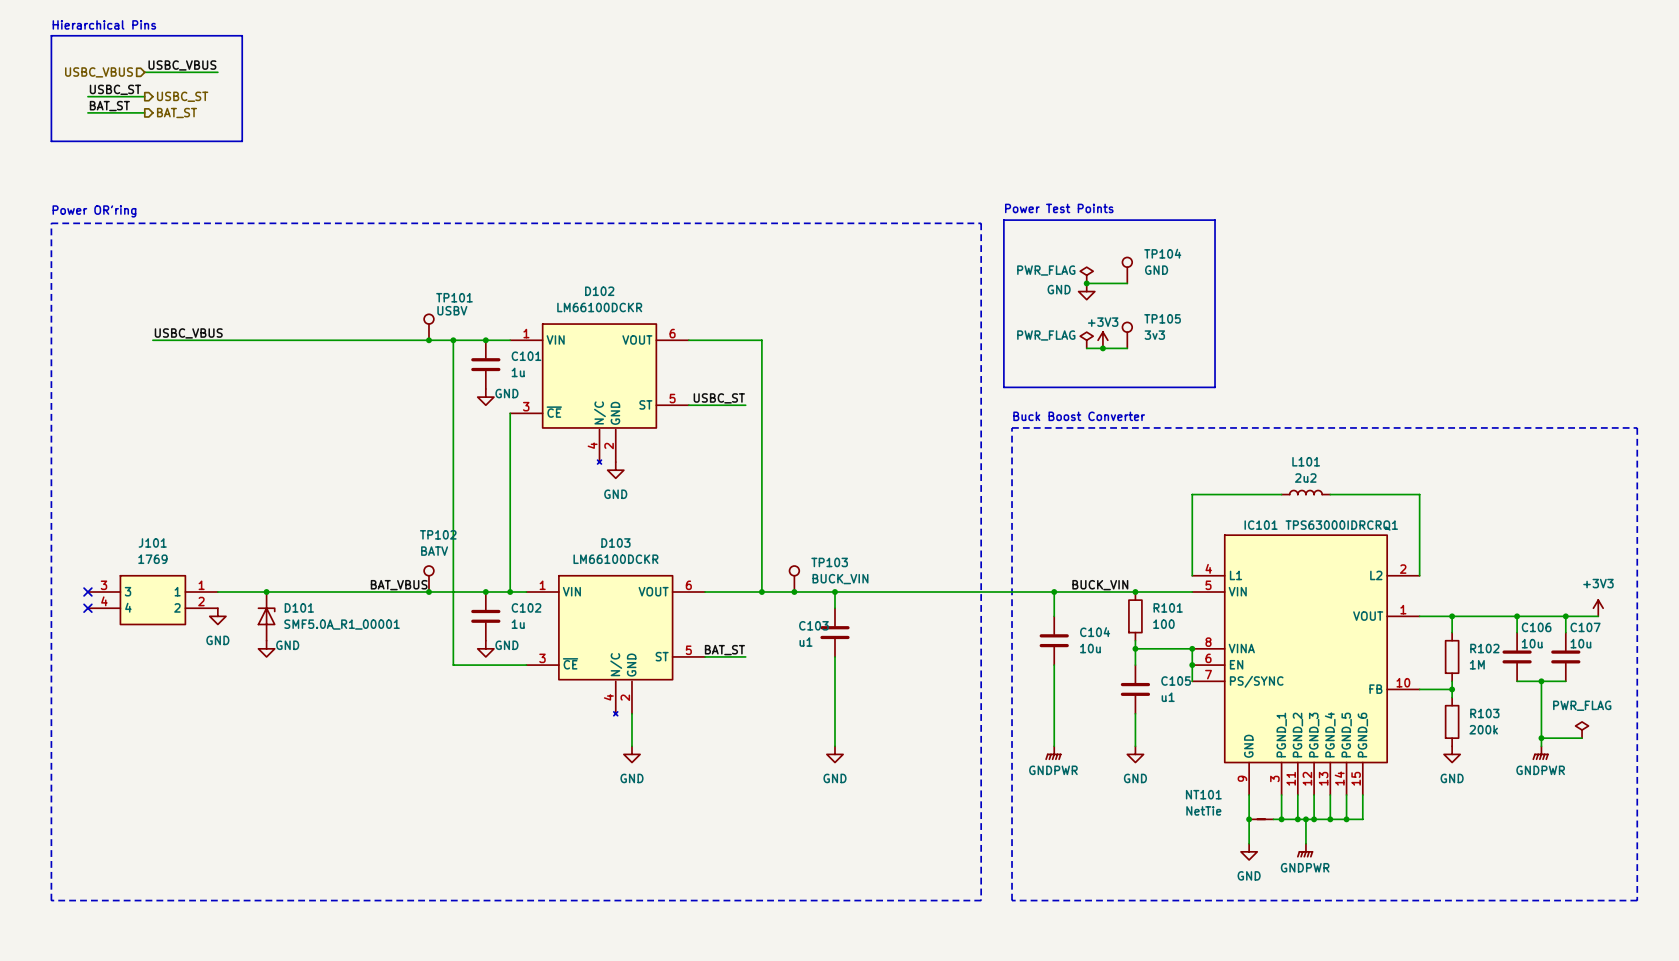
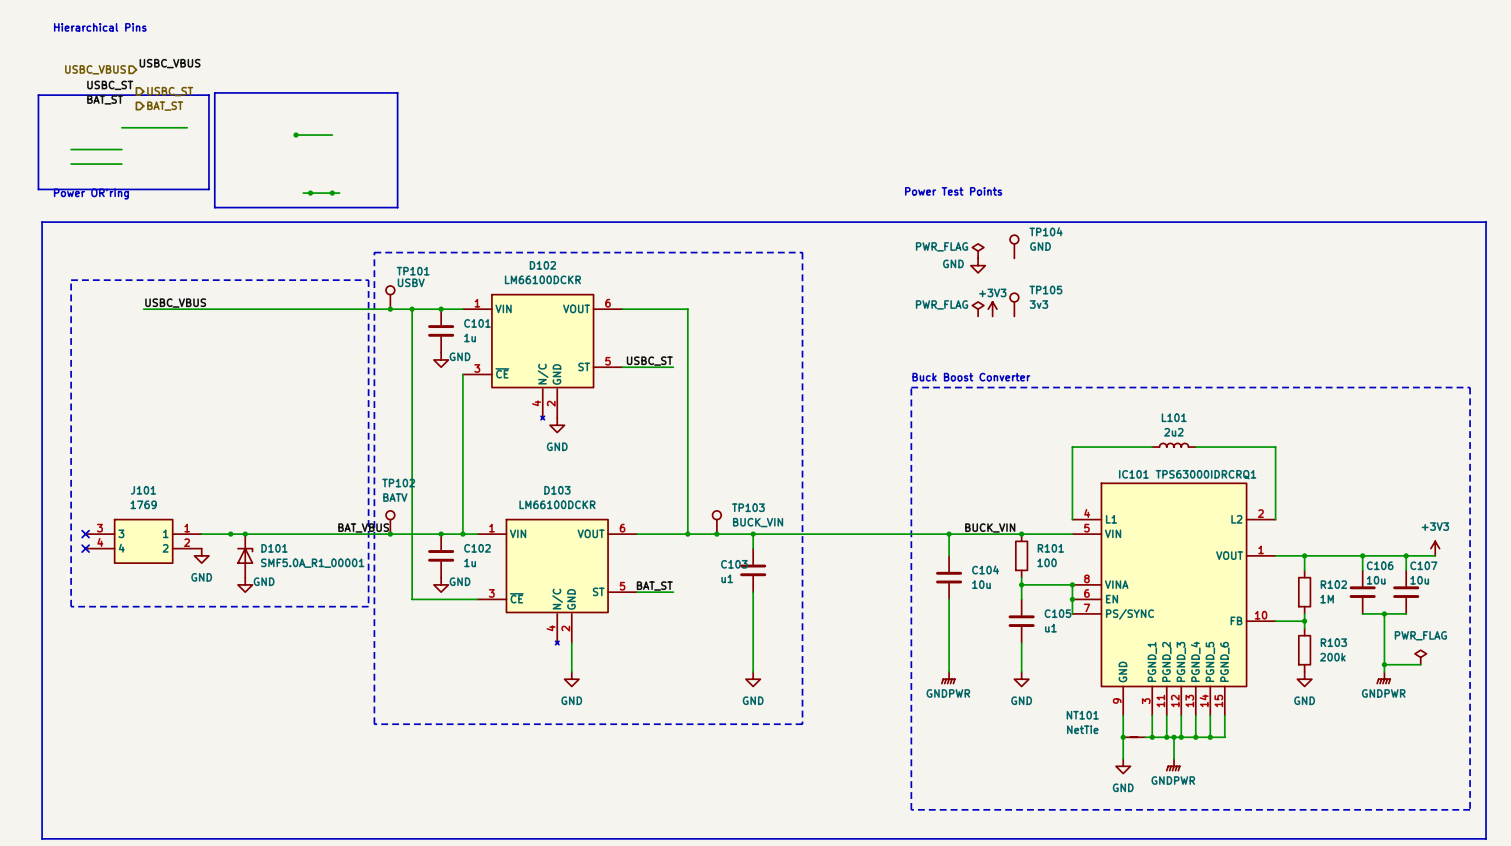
line: (51, 35) (242, 35) (242, 141) (51, 141) (51, 35) -> (38, 95) (208, 95) (208, 189) (38, 189) (38, 95)
wire: (144, 72) (217, 72) -> (121, 127) (187, 127)
wire: (87, 96) (144, 96) -> (71, 149) (121, 149)
line: none -> (214, 92) (397, 92) (397, 207) (214, 207) (214, 92)
wire: (87, 112) (144, 112) -> (71, 164) (121, 164)
wire: none -> (296, 135) (332, 135)
junction: none -> (296, 135)
wire: none -> (303, 193) (339, 193)
junction: none -> (310, 193)
junction: none -> (332, 193)
line: (1003, 220) (1215, 220) (1215, 387) (1003, 387) (1003, 220) -> none
line: (51, 223) (981, 223) (981, 900) (51, 900) (51, 223) -> (42, 222) (42, 838) (1486, 838) (1486, 222) (42, 222)
line: none -> (374, 252) (802, 252) (802, 724) (374, 724) (374, 252)
wire: (1086, 283) (1127, 283) -> none
junction: (1086, 283) -> none
line: none -> (71, 280) (368, 280) (368, 606) (71, 606) (71, 280)
wire: (1086, 348) (1127, 348) -> none
junction: (1102, 348) -> none
junction: none -> (230, 534)

